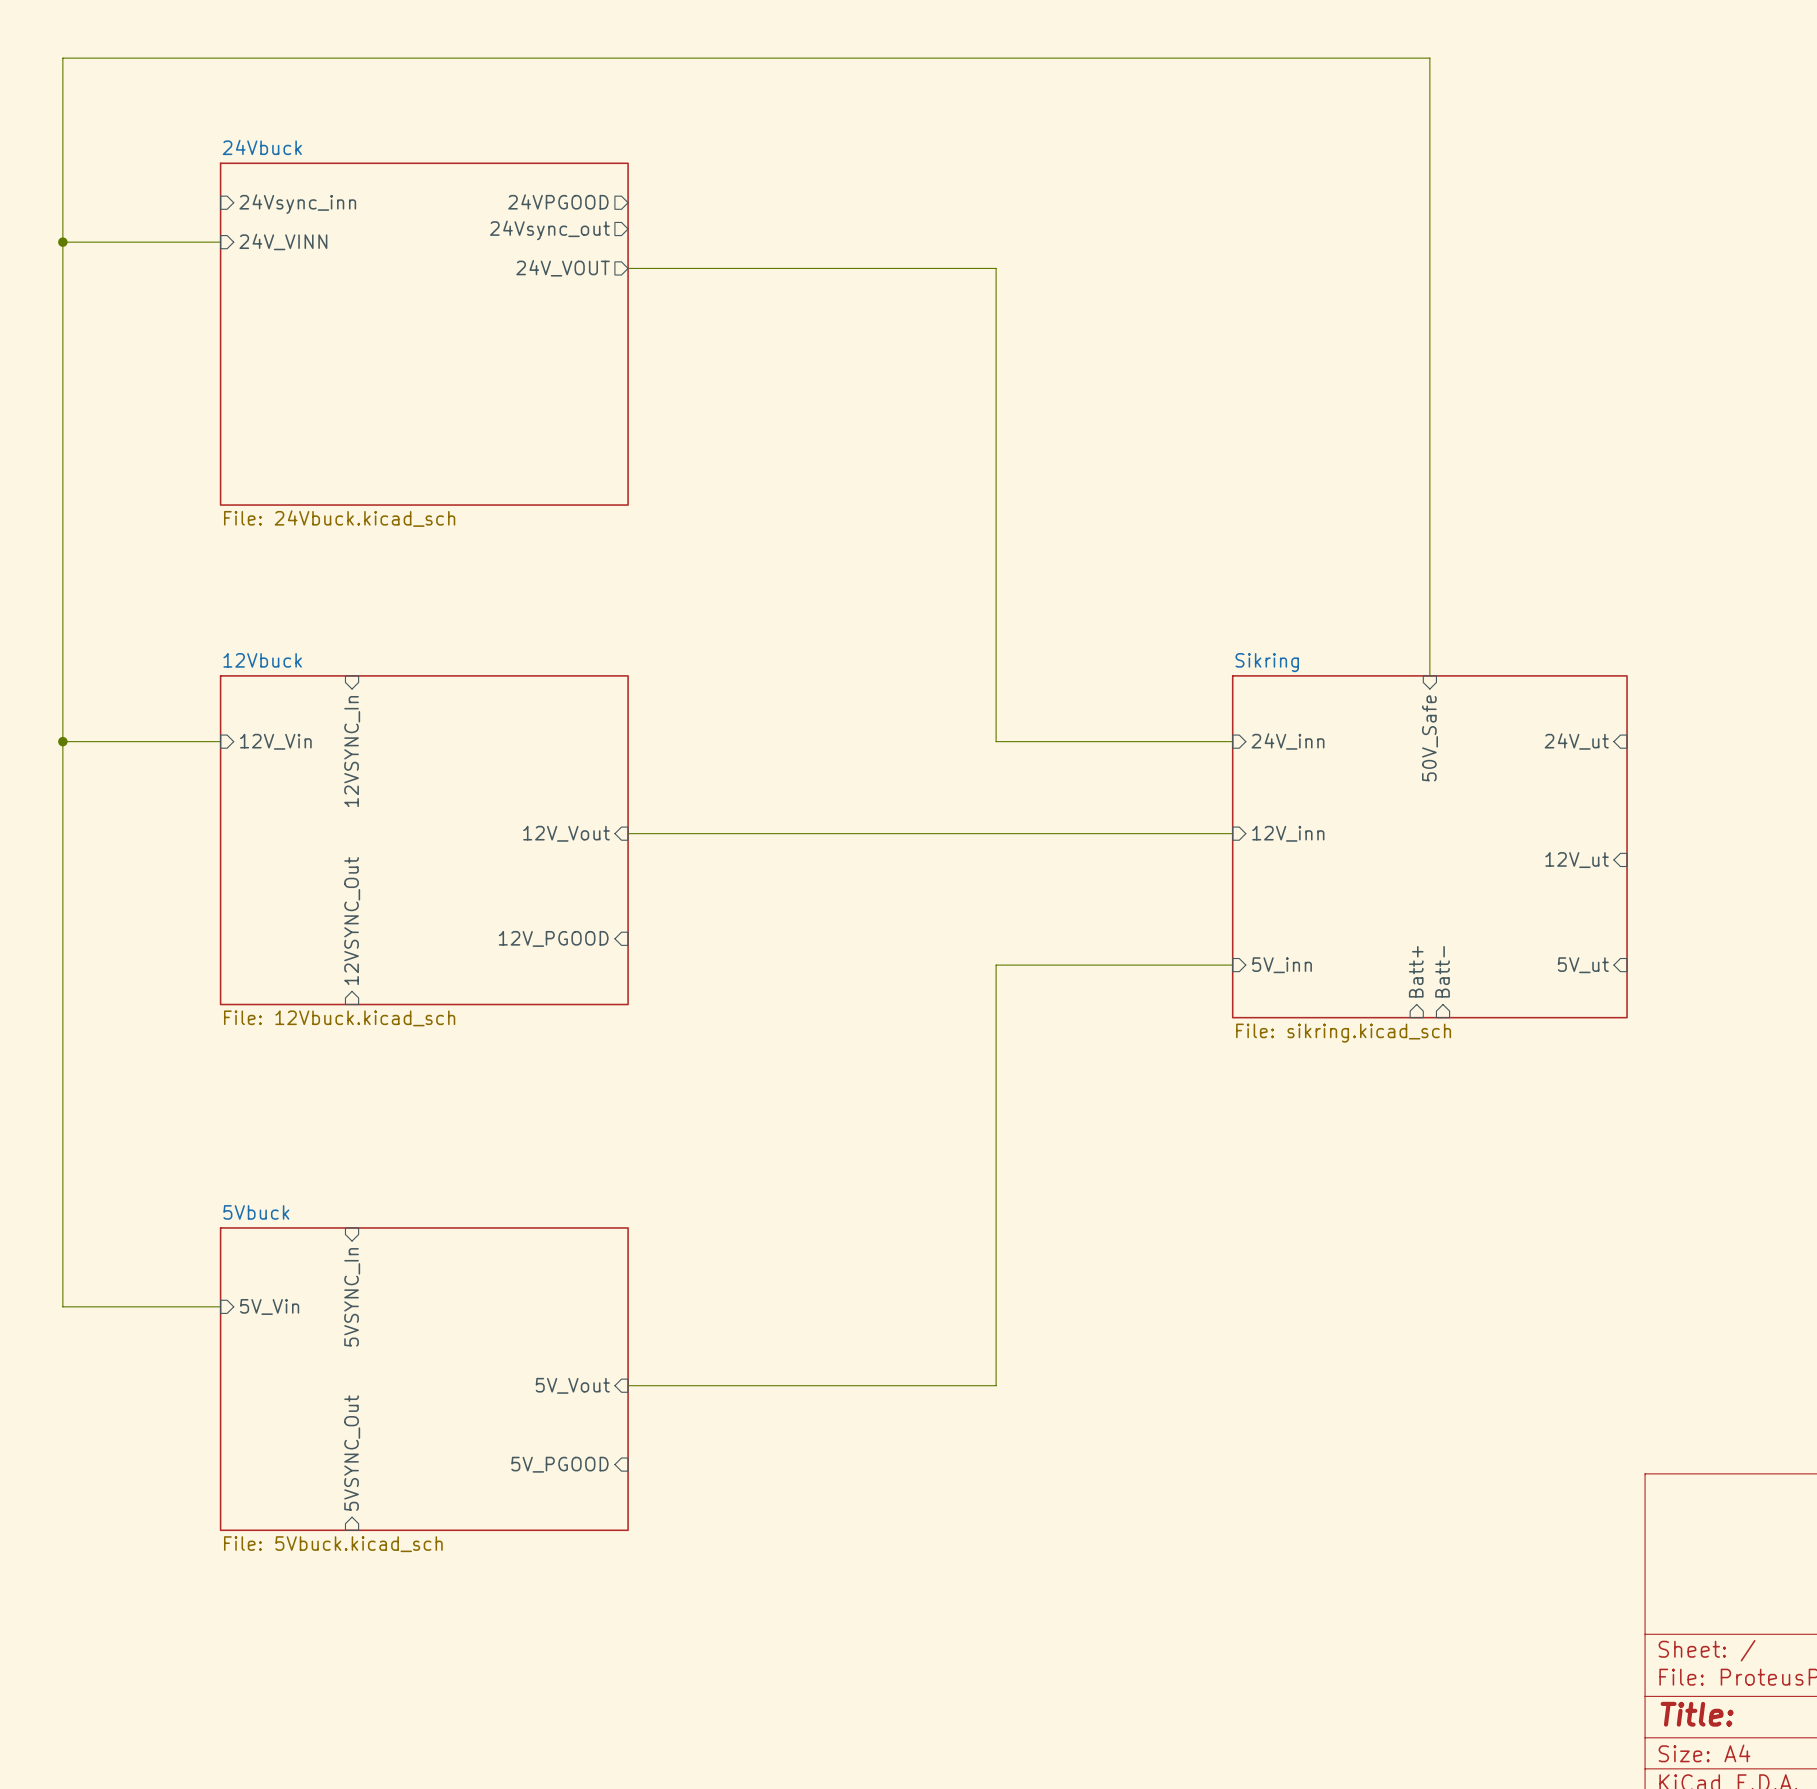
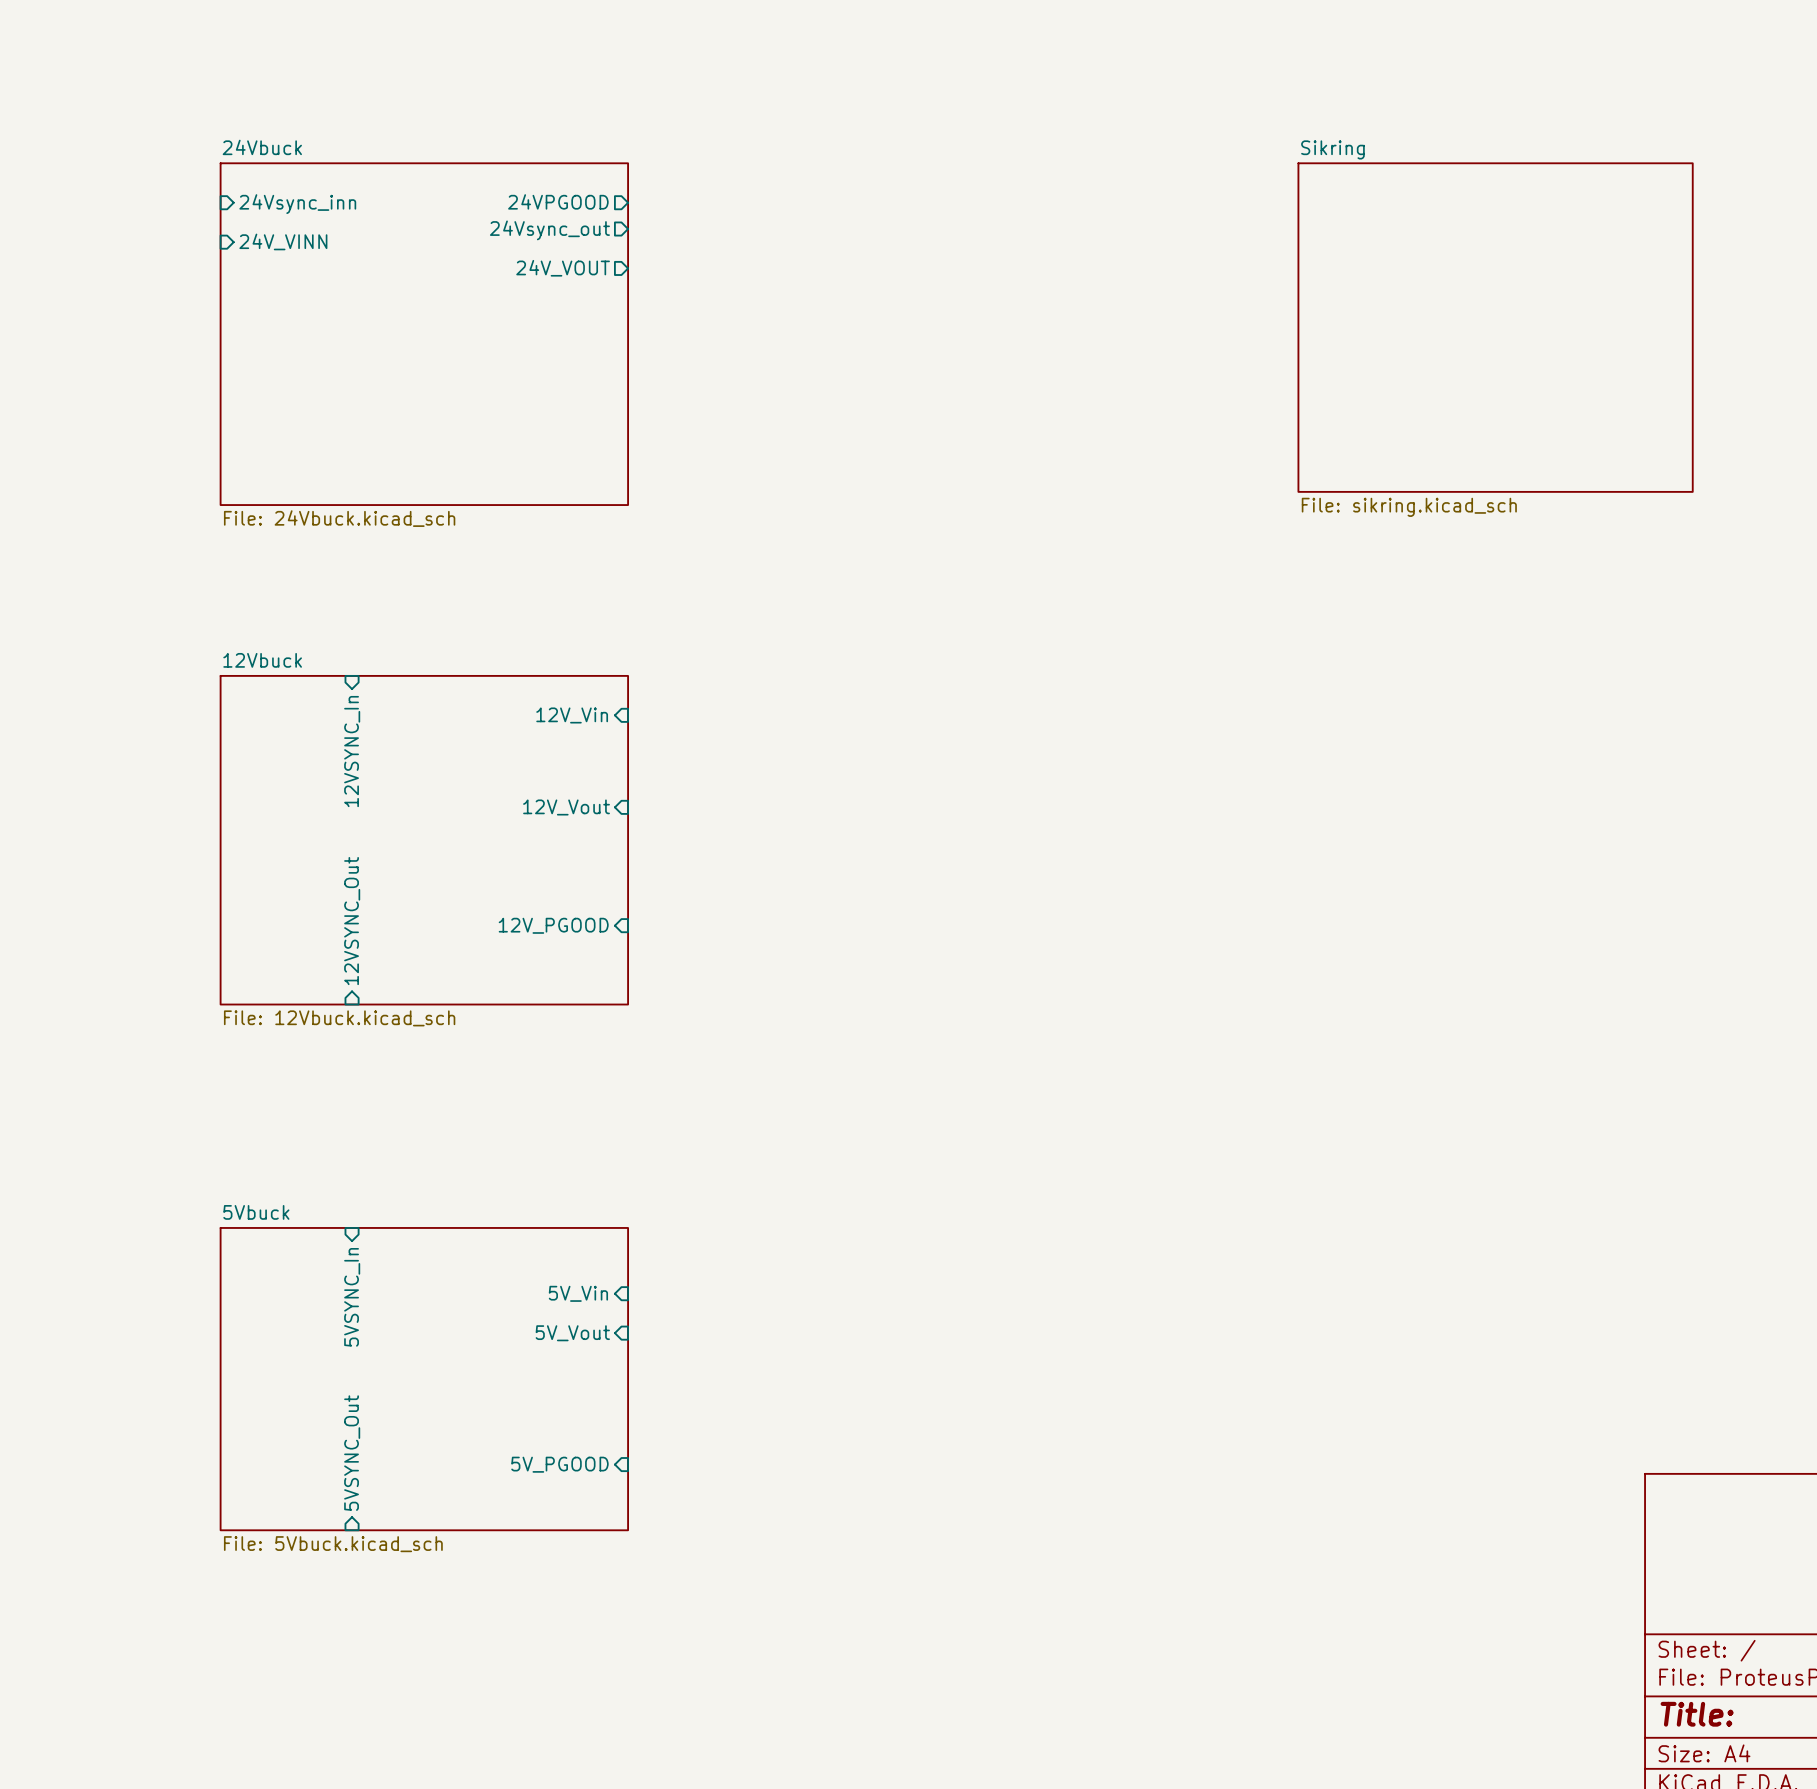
wire: (62, 242) (220, 242) -> none
junction: (62, 242) -> none
wire: (628, 268) (996, 268) (996, 741) (1232, 741) -> none
sheet Sikring: none -> File: sikring.kicad_sch (1495, 327)
wire: (1429, 675) (1429, 58) (62, 58) (62, 1306) (220, 1306) -> none
sheet pin: none -> 12V_Vin (572, 715)
sheet pin: 50V_Safe (1430, 738) -> none
wire: (62, 741) (220, 741) -> none
junction: (62, 741) -> none
sheet pin: 12V_Vin (275, 741) -> none
sheet pin: 24V_inn (1287, 741) -> none
sheet pin: 24V_ut (1576, 741) -> none
sheet pin position: 12V_Vout (566, 833) -> 12V_Vout (566, 807)
wire: (628, 833) (1232, 833) -> none
sheet pin: 12V_inn (1288, 833) -> none
sheet Sikring: File: sikring.kicad_sch (1429, 846) -> none
sheet pin: 12V_ut (1577, 860) -> none
sheet pin position: 12V_PGOOD (553, 938) -> 12V_PGOOD (553, 925)
wire: (1232, 965) (996, 965) (996, 1385) (628, 1385) -> none
sheet pin: 5V_inn (1282, 965) -> none
sheet pin: 5V_ut (1583, 965) -> none
sheet pin: Batt+ (1416, 971) -> none
sheet pin: Batt- (1442, 971) -> none
sheet pin: none -> 5V_Vin (578, 1293)
sheet pin: 5V_Vin (269, 1306) -> none
sheet pin position: 5V_Vout (572, 1385) -> 5V_Vout (572, 1333)

